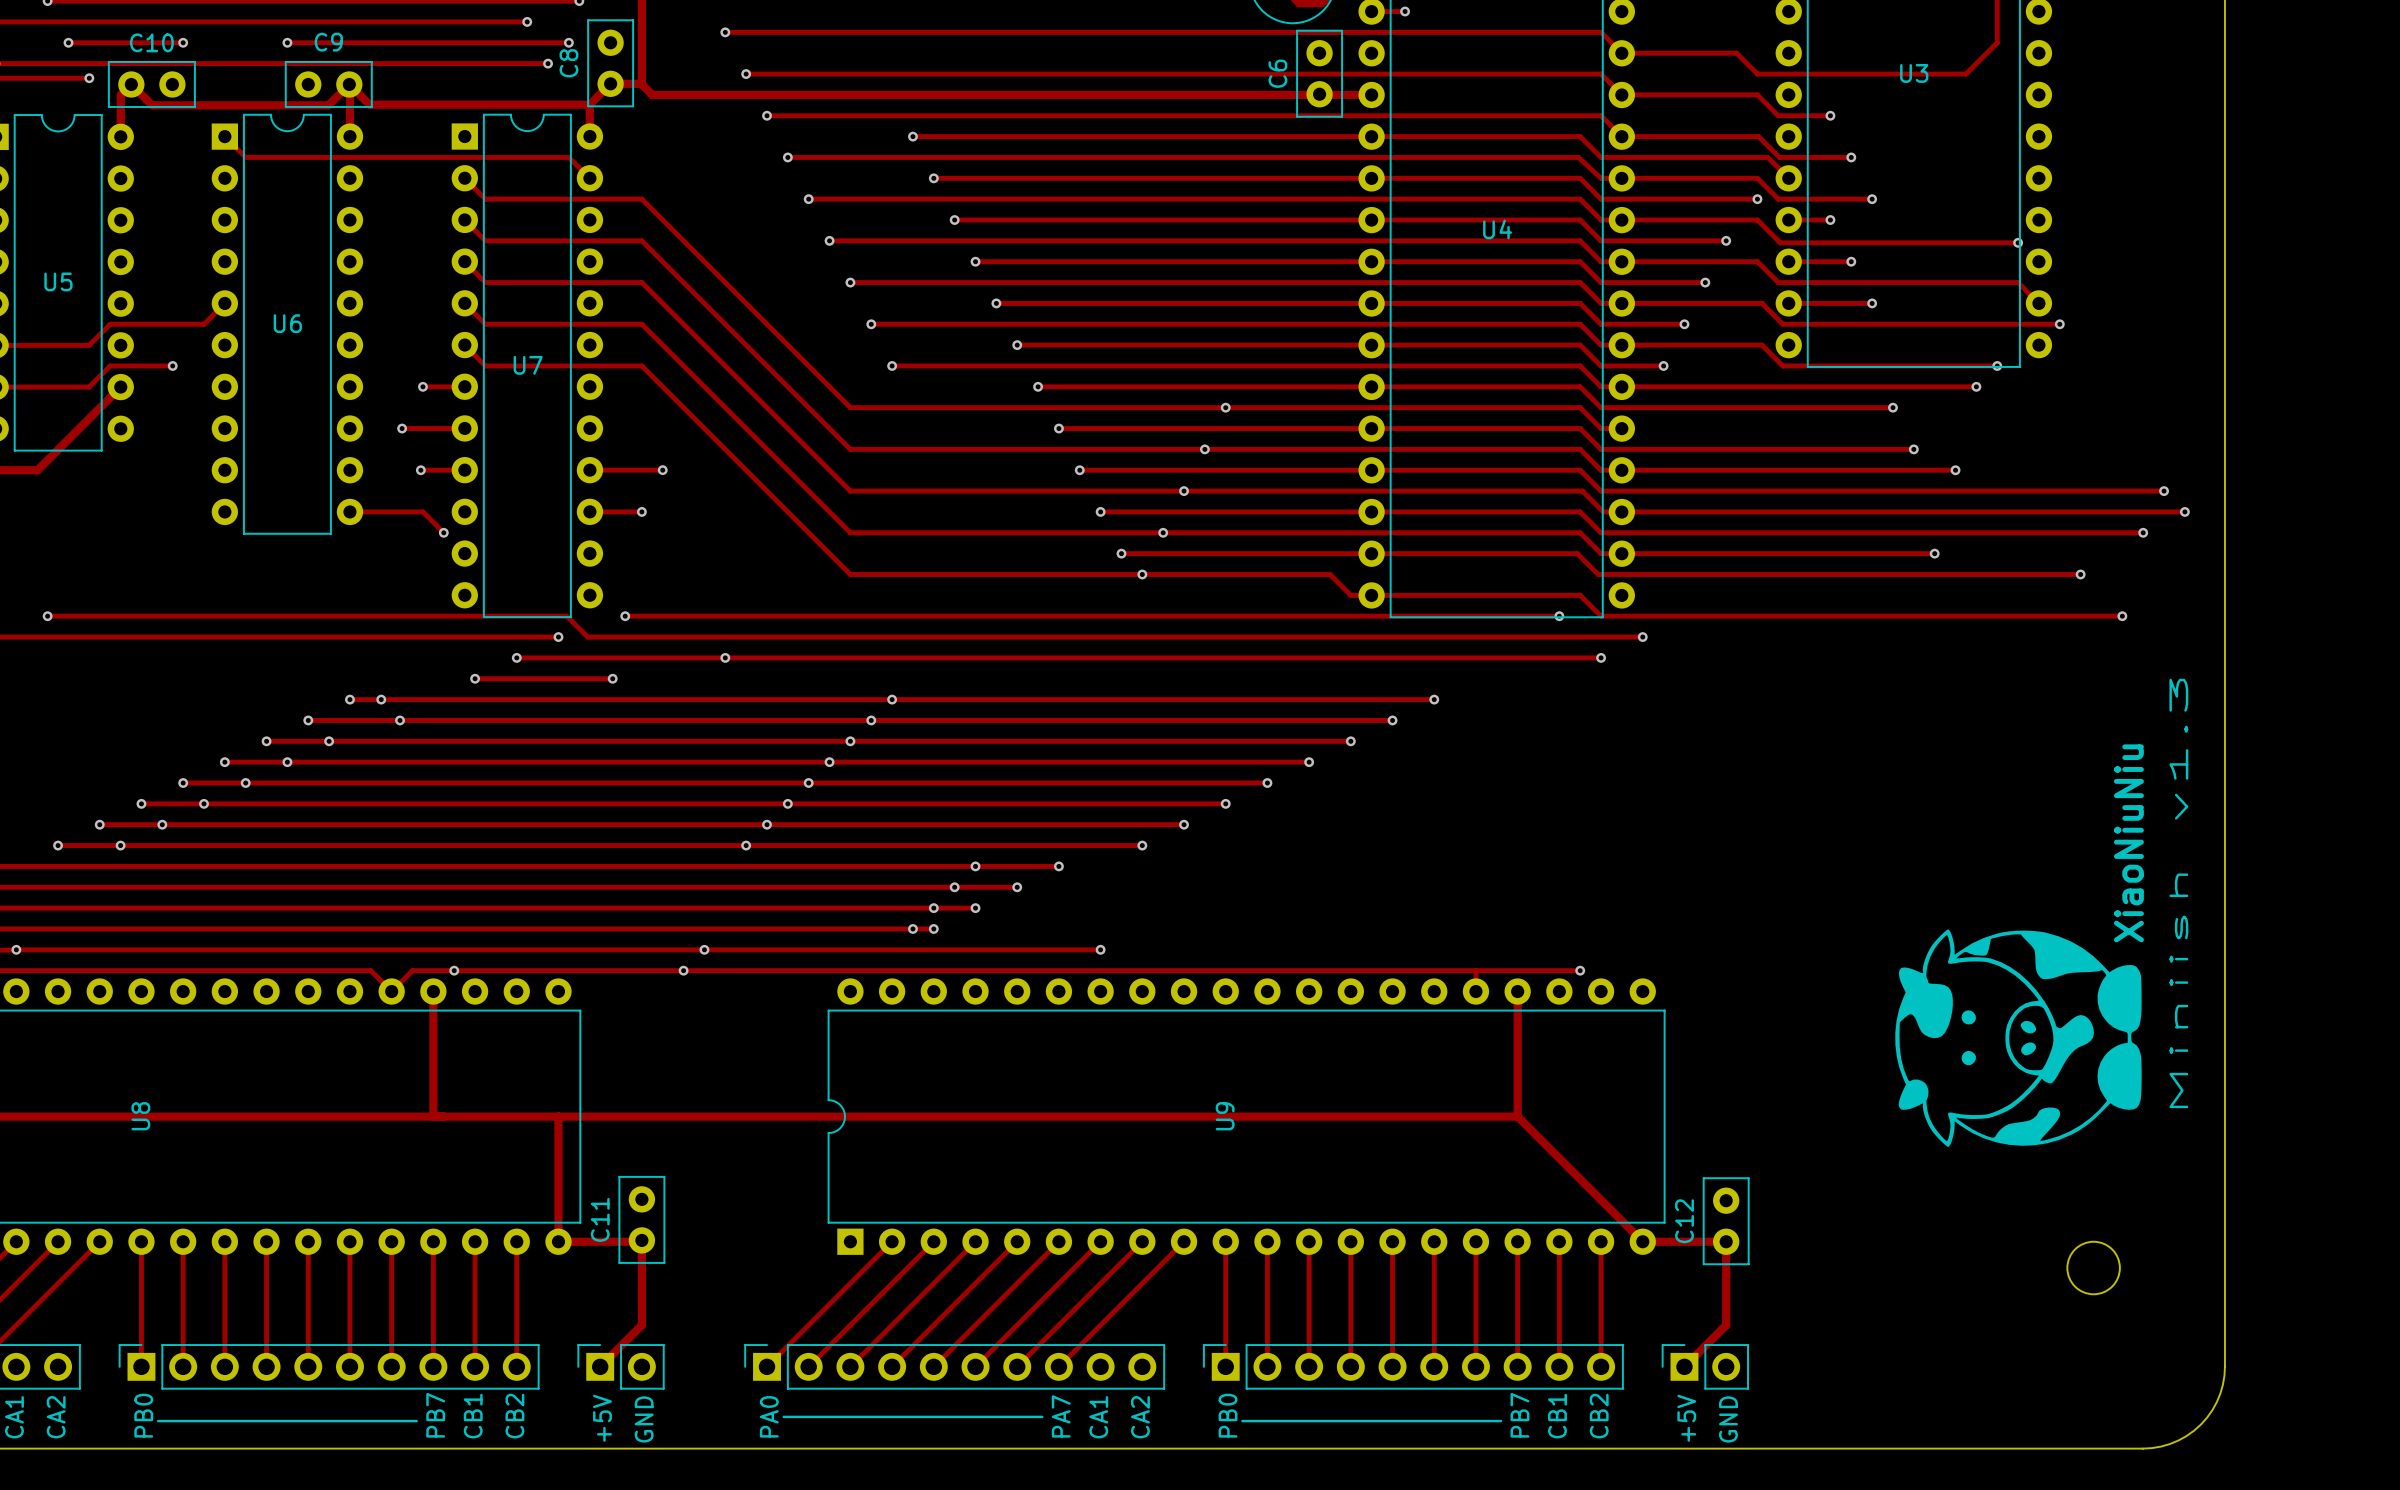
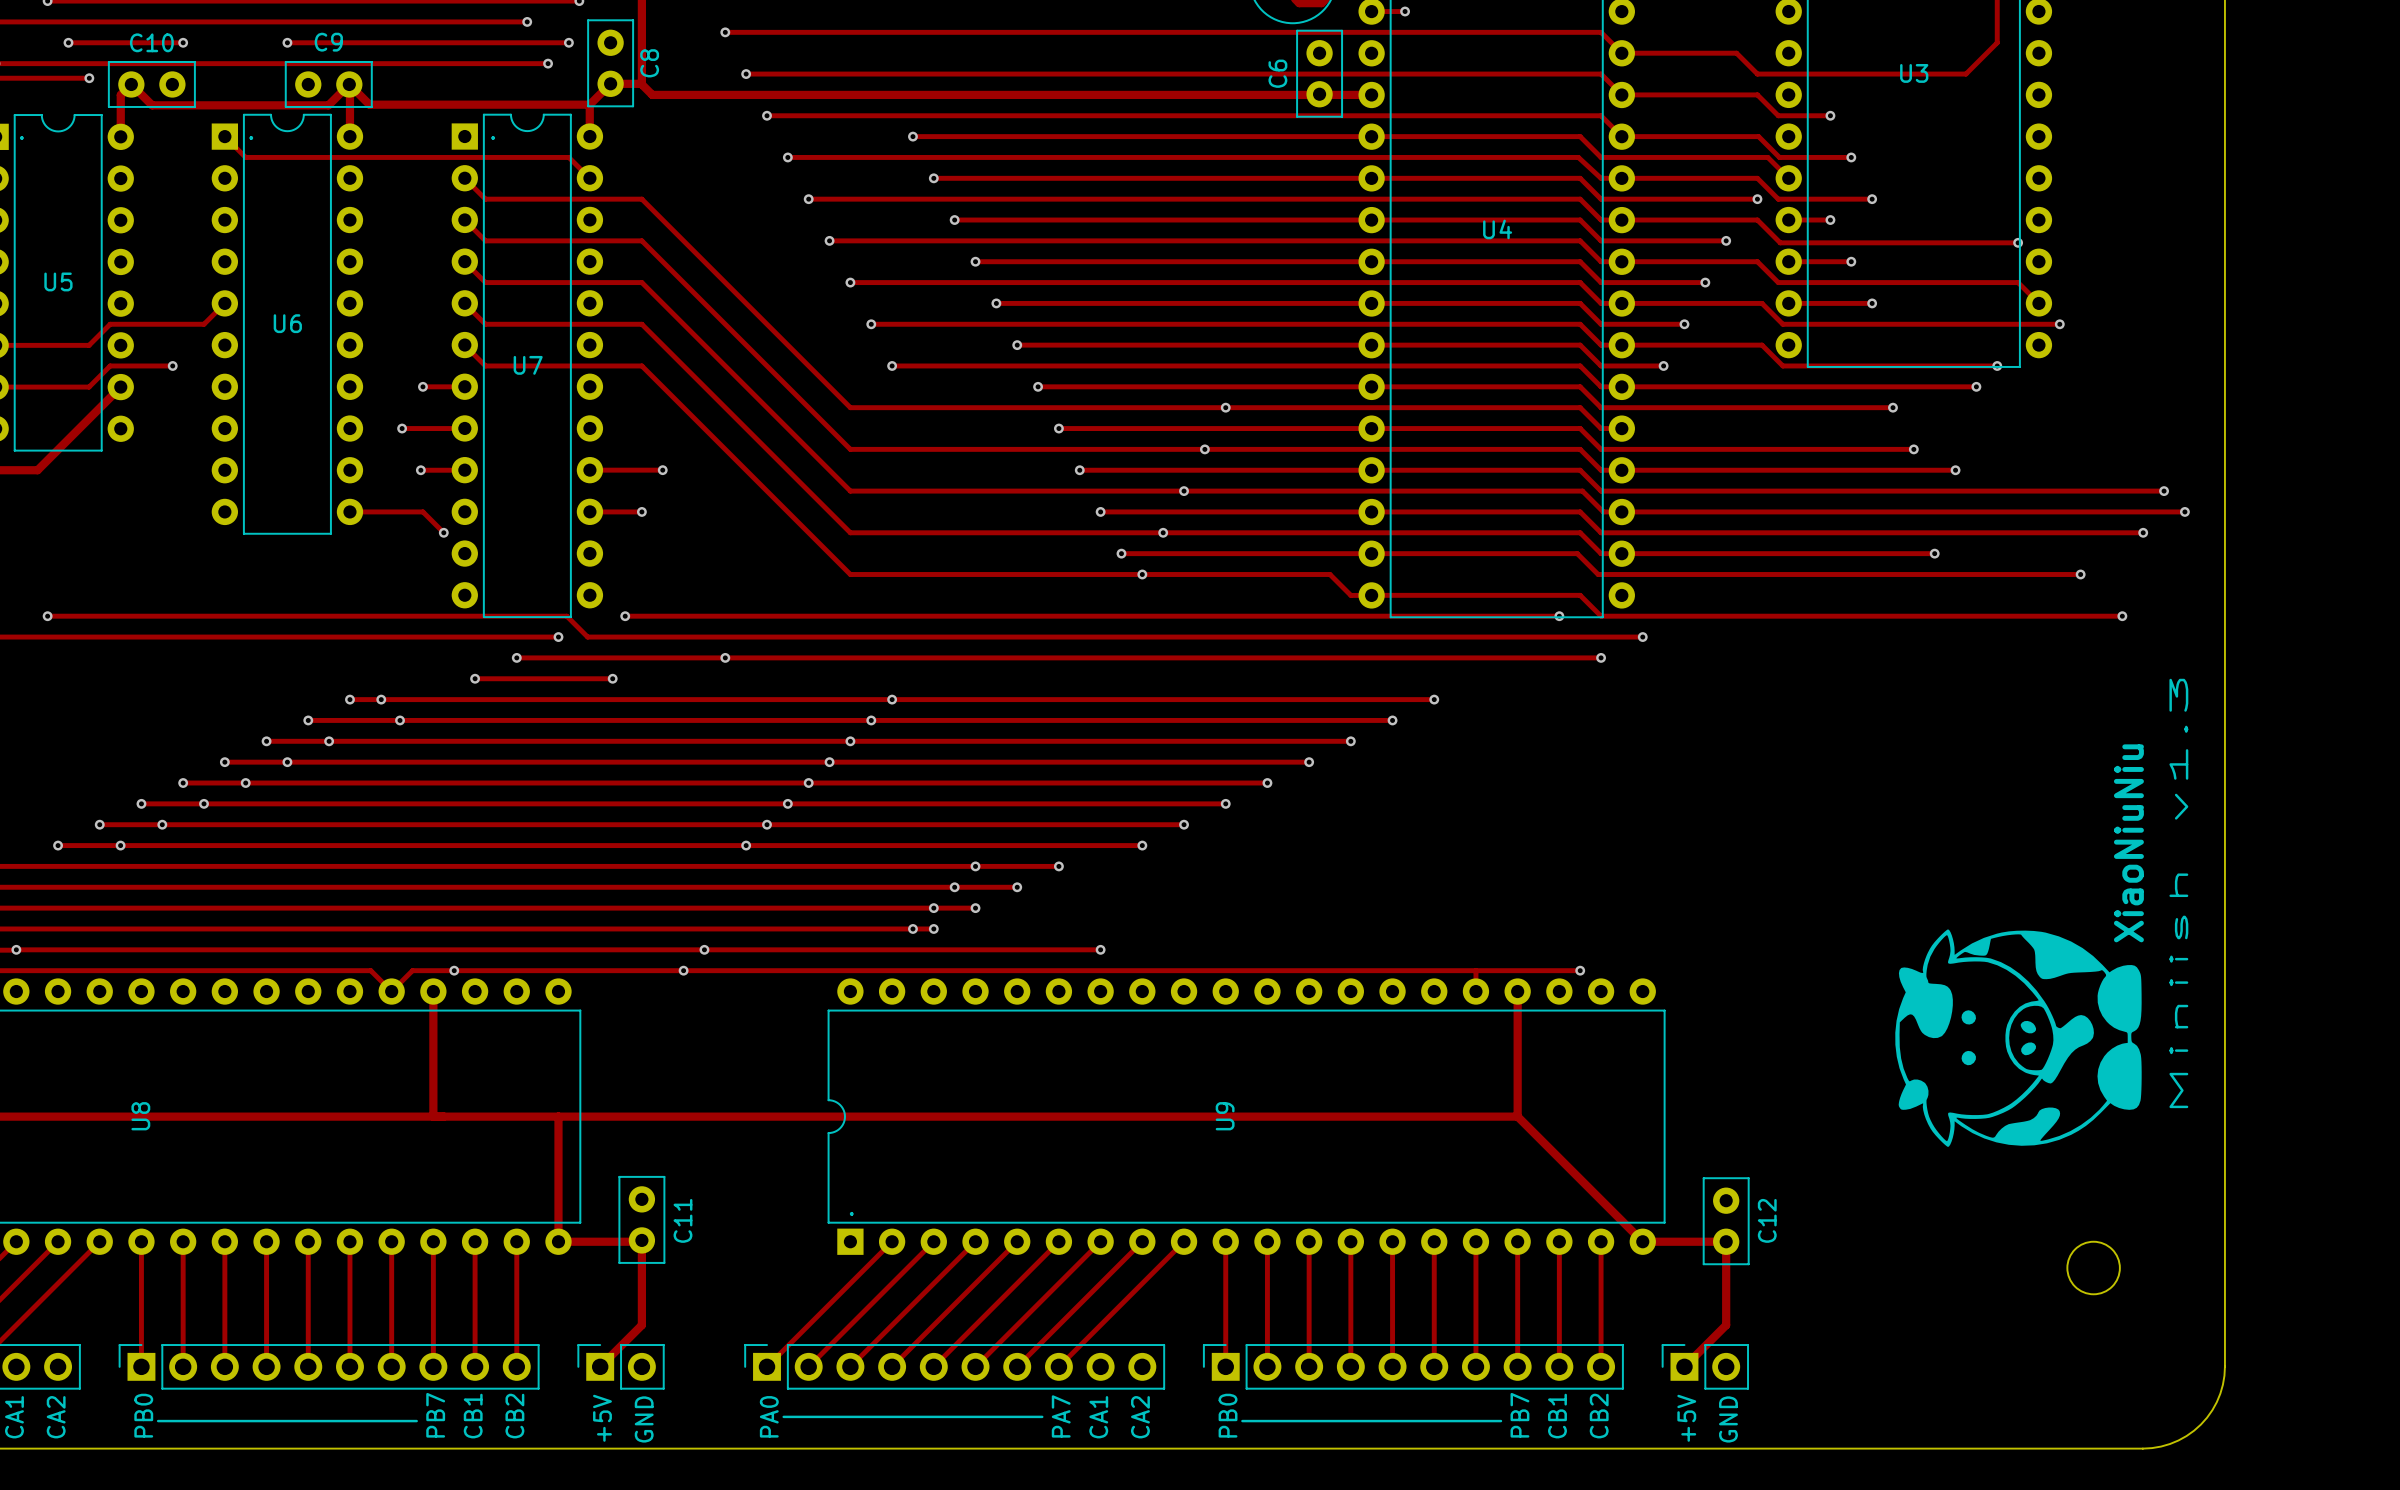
C8 name position: C8 (568, 63) -> C8 (649, 63)
text: none -> . (21, 137)
text: none -> . (251, 137)
text: none -> . (493, 137)
text: none -> . (851, 1213)
C11 name position: C11 (600, 1219) -> C11 (682, 1220)
C12 name position: C12 (1684, 1221) -> C12 (1767, 1220)

